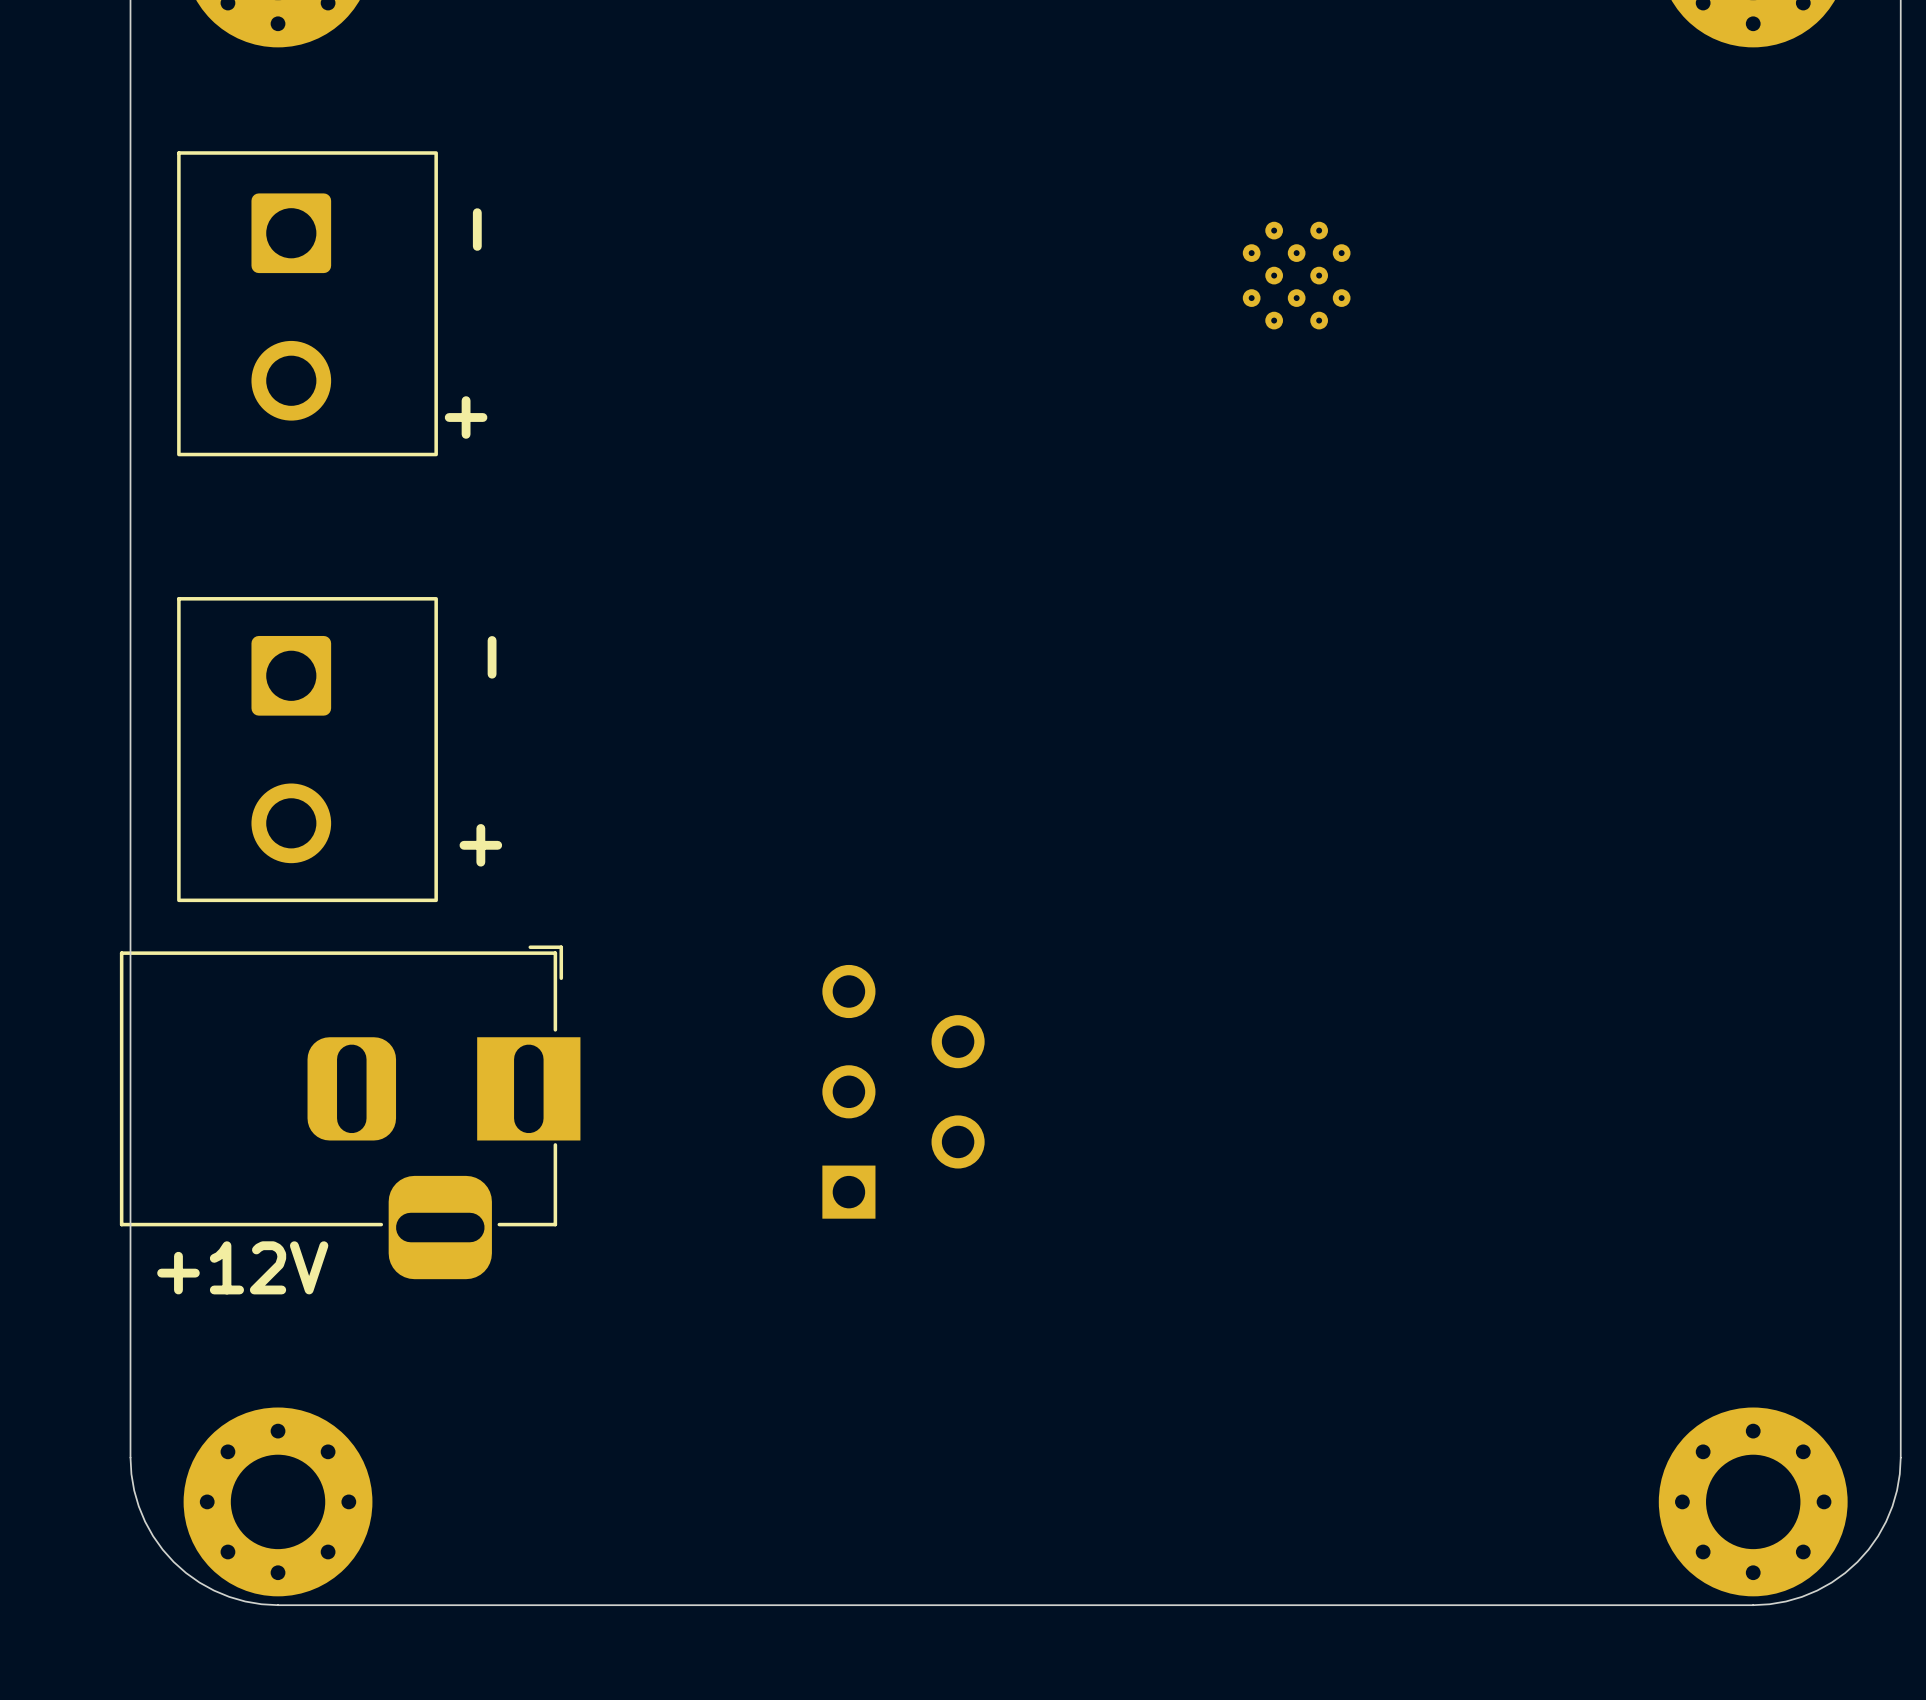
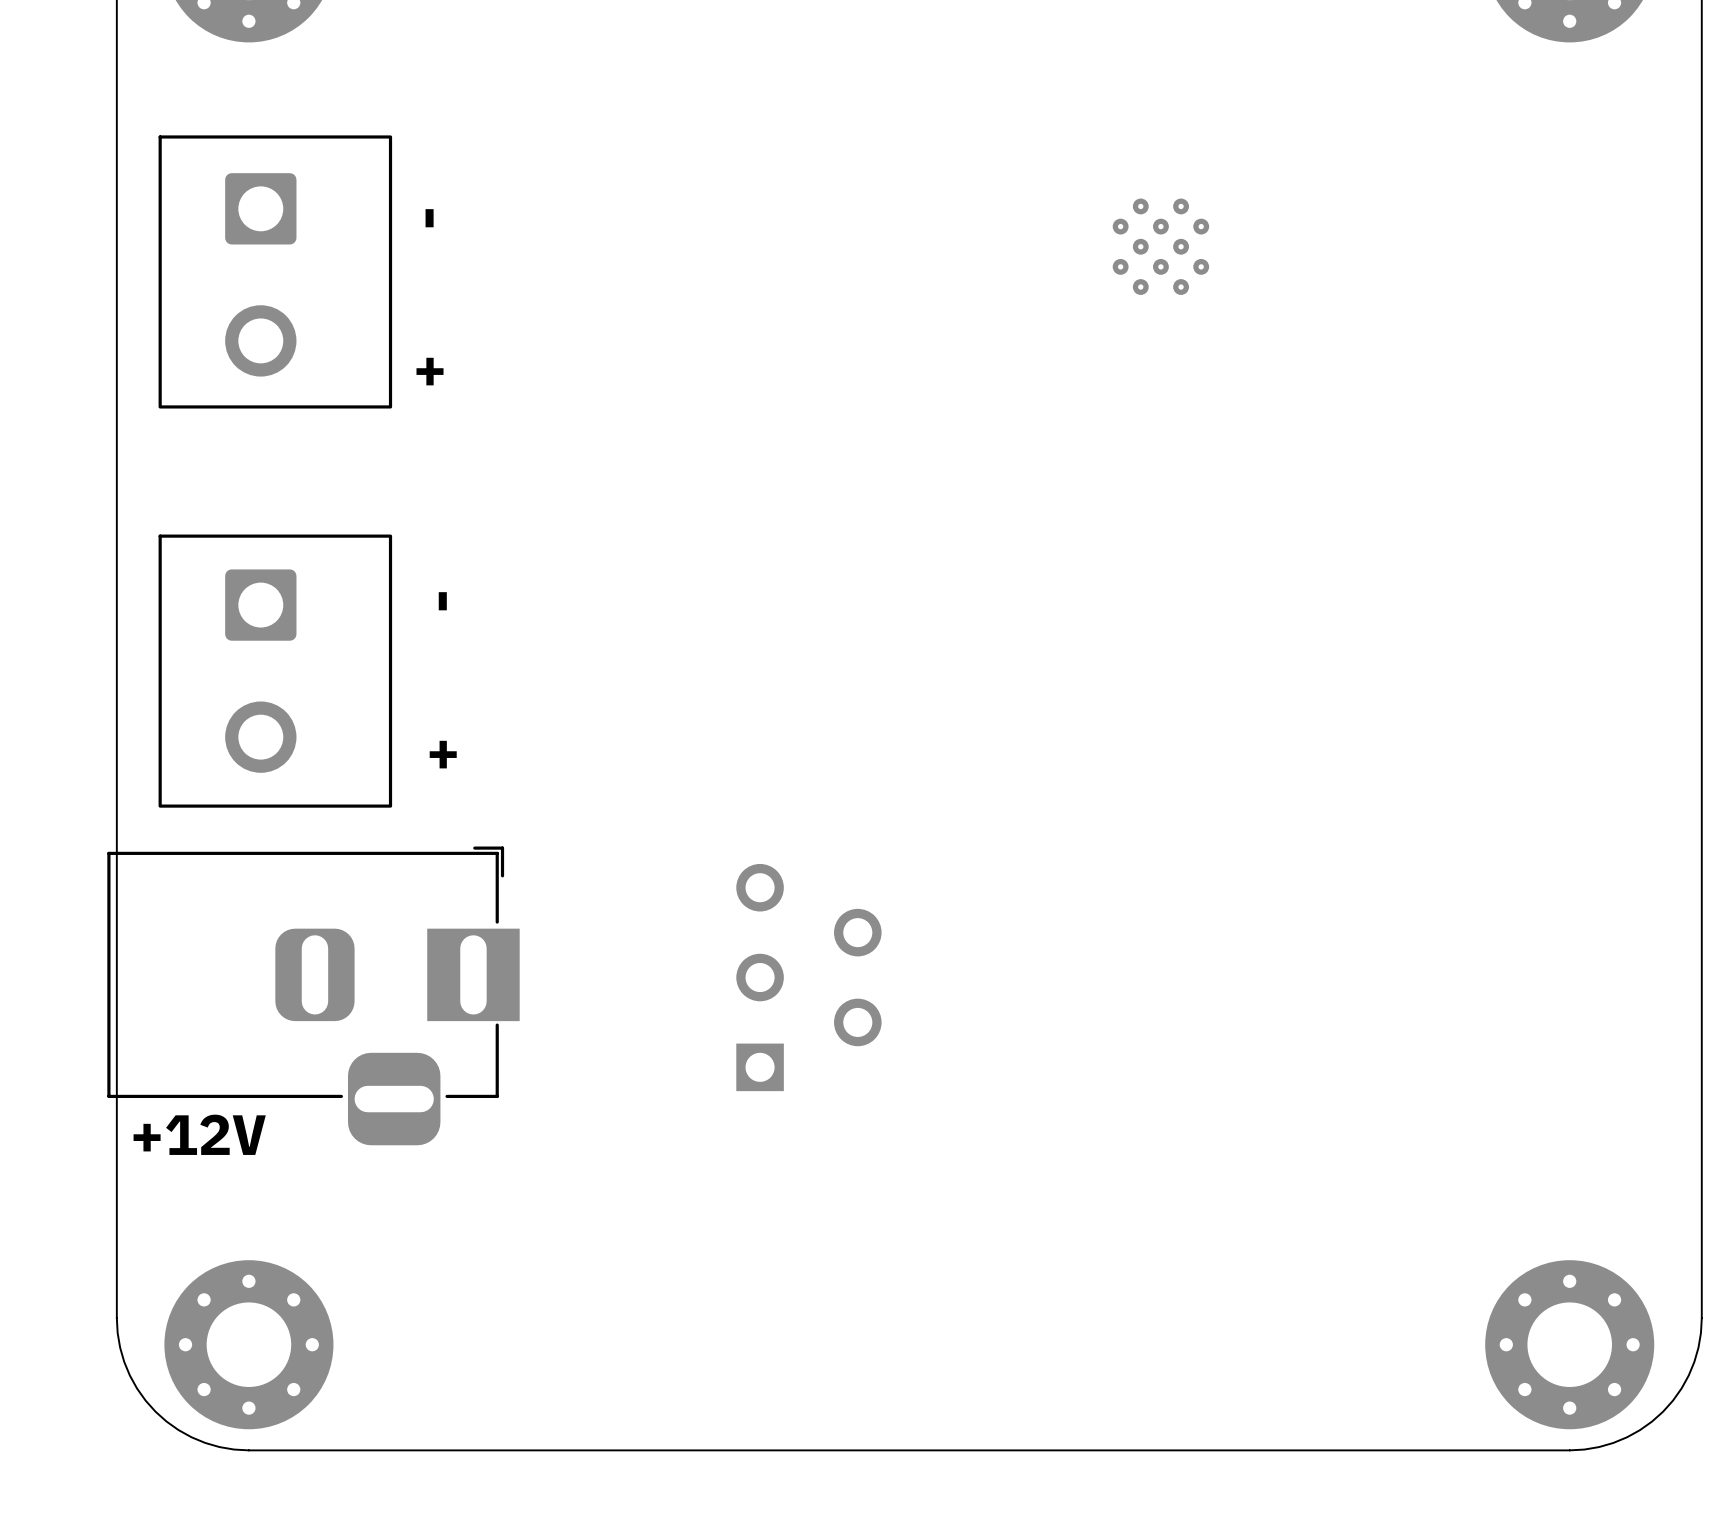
board edge: (1900, 1457) (1897, 1490) (1886, 1521) (1868, 1549) (1857, 1561) (1831, 1582) (1817, 1590) (1786, 1601) (1753, 1605) (261, 1604) (229, 1596) (214, 1590) (186, 1573) (173, 1561) (153, 1536) (138, 1506) (134, 1490) (130, 1457) -> (1701, 1305) (1700, 1333) (1694, 1361) (1681, 1388) (1672, 1400) (1652, 1421) (1627, 1437) (1599, 1447) (1584, 1449) (248, 1450) (219, 1447) (191, 1437) (166, 1421) (155, 1411) (137, 1388) (124, 1361) (117, 1333) (116, 1305)

